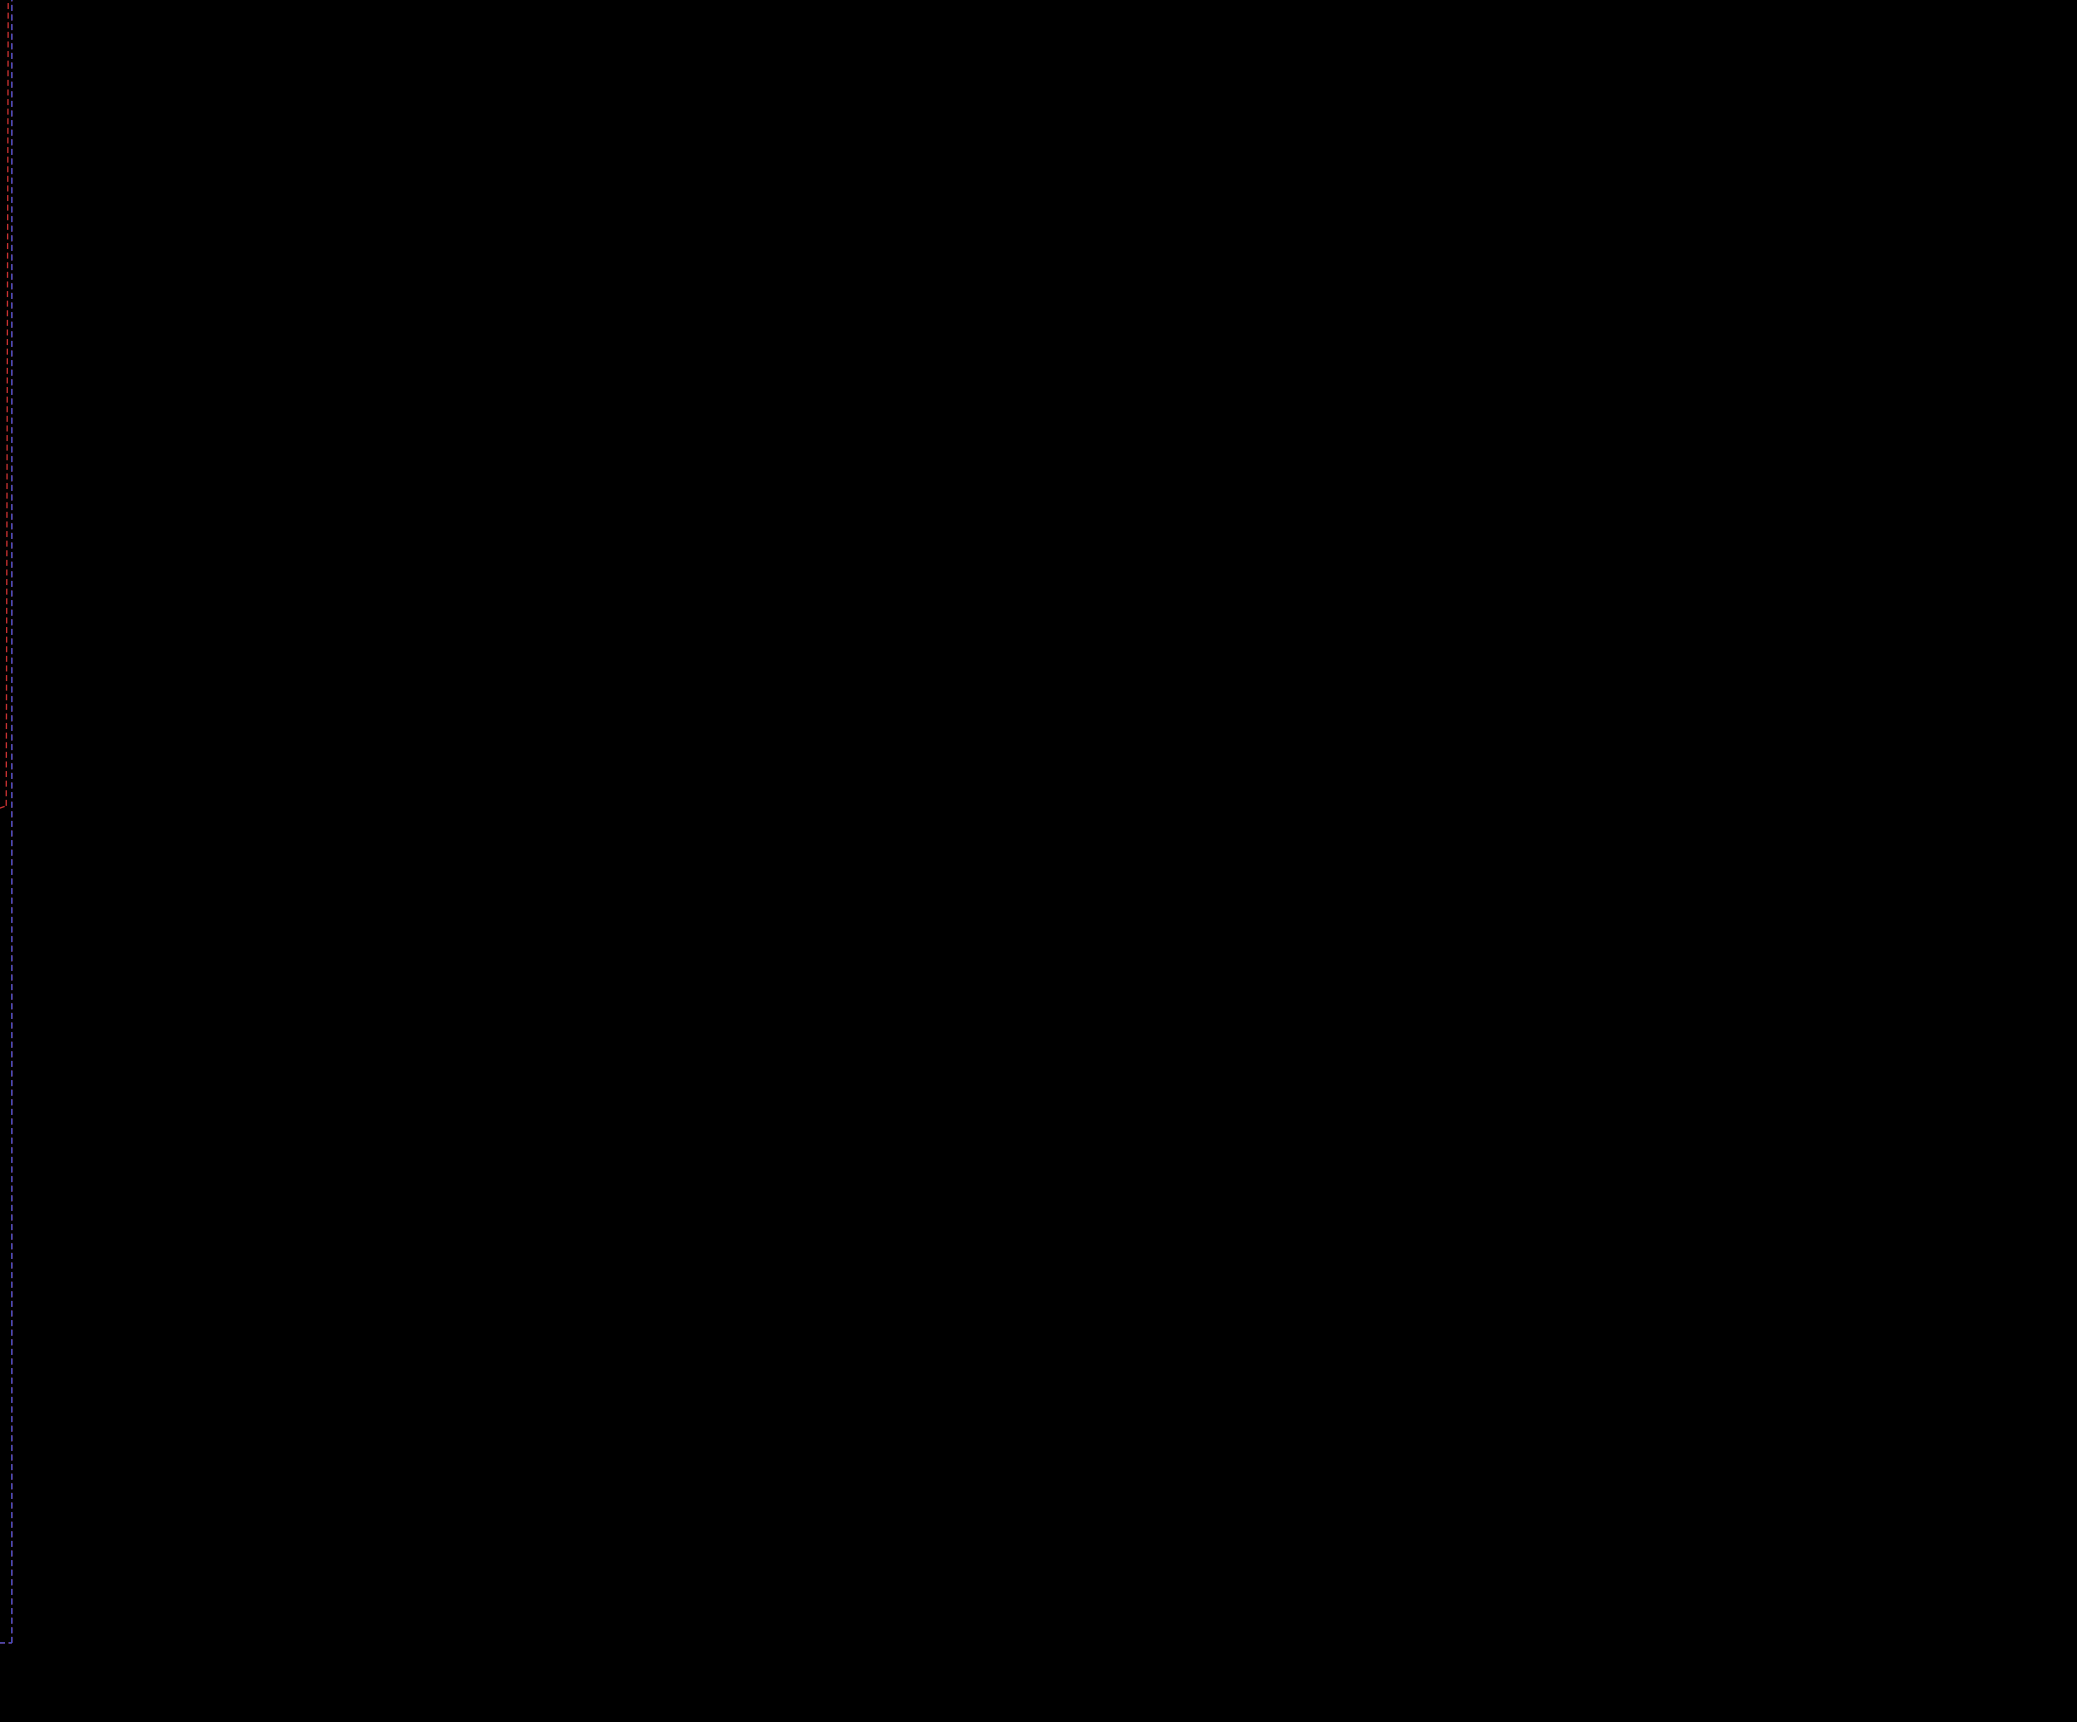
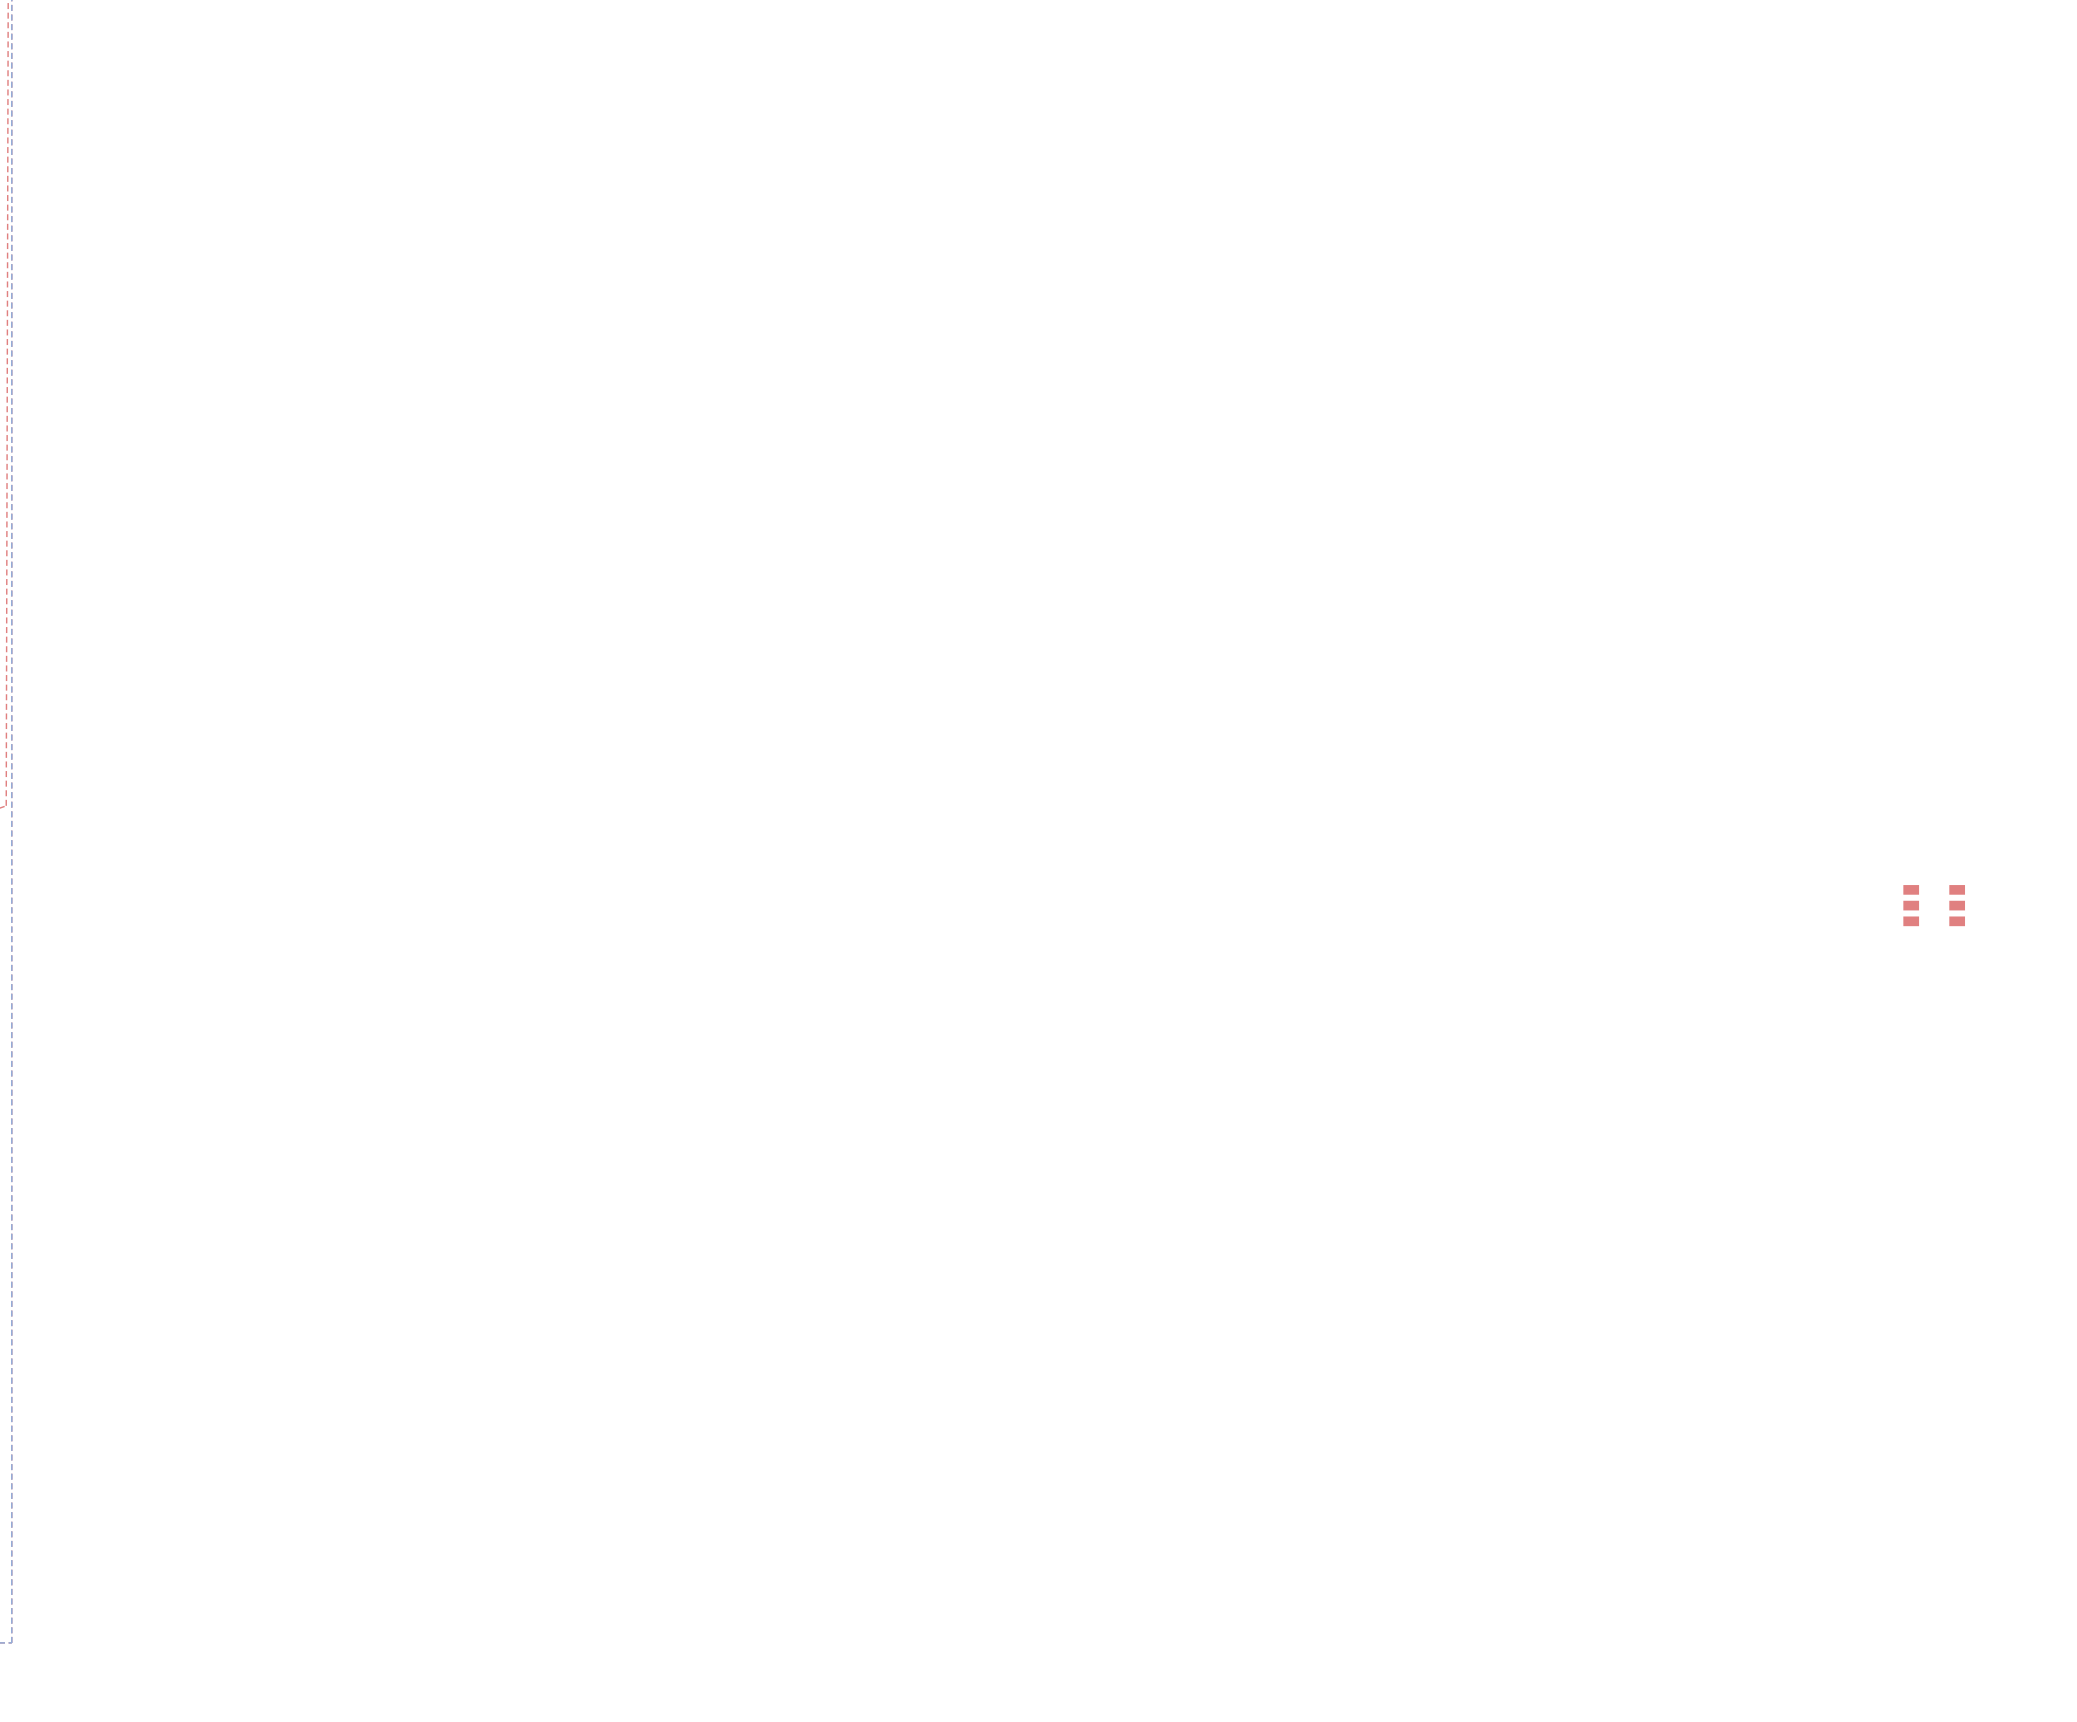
part: none -> (1934, 905)

